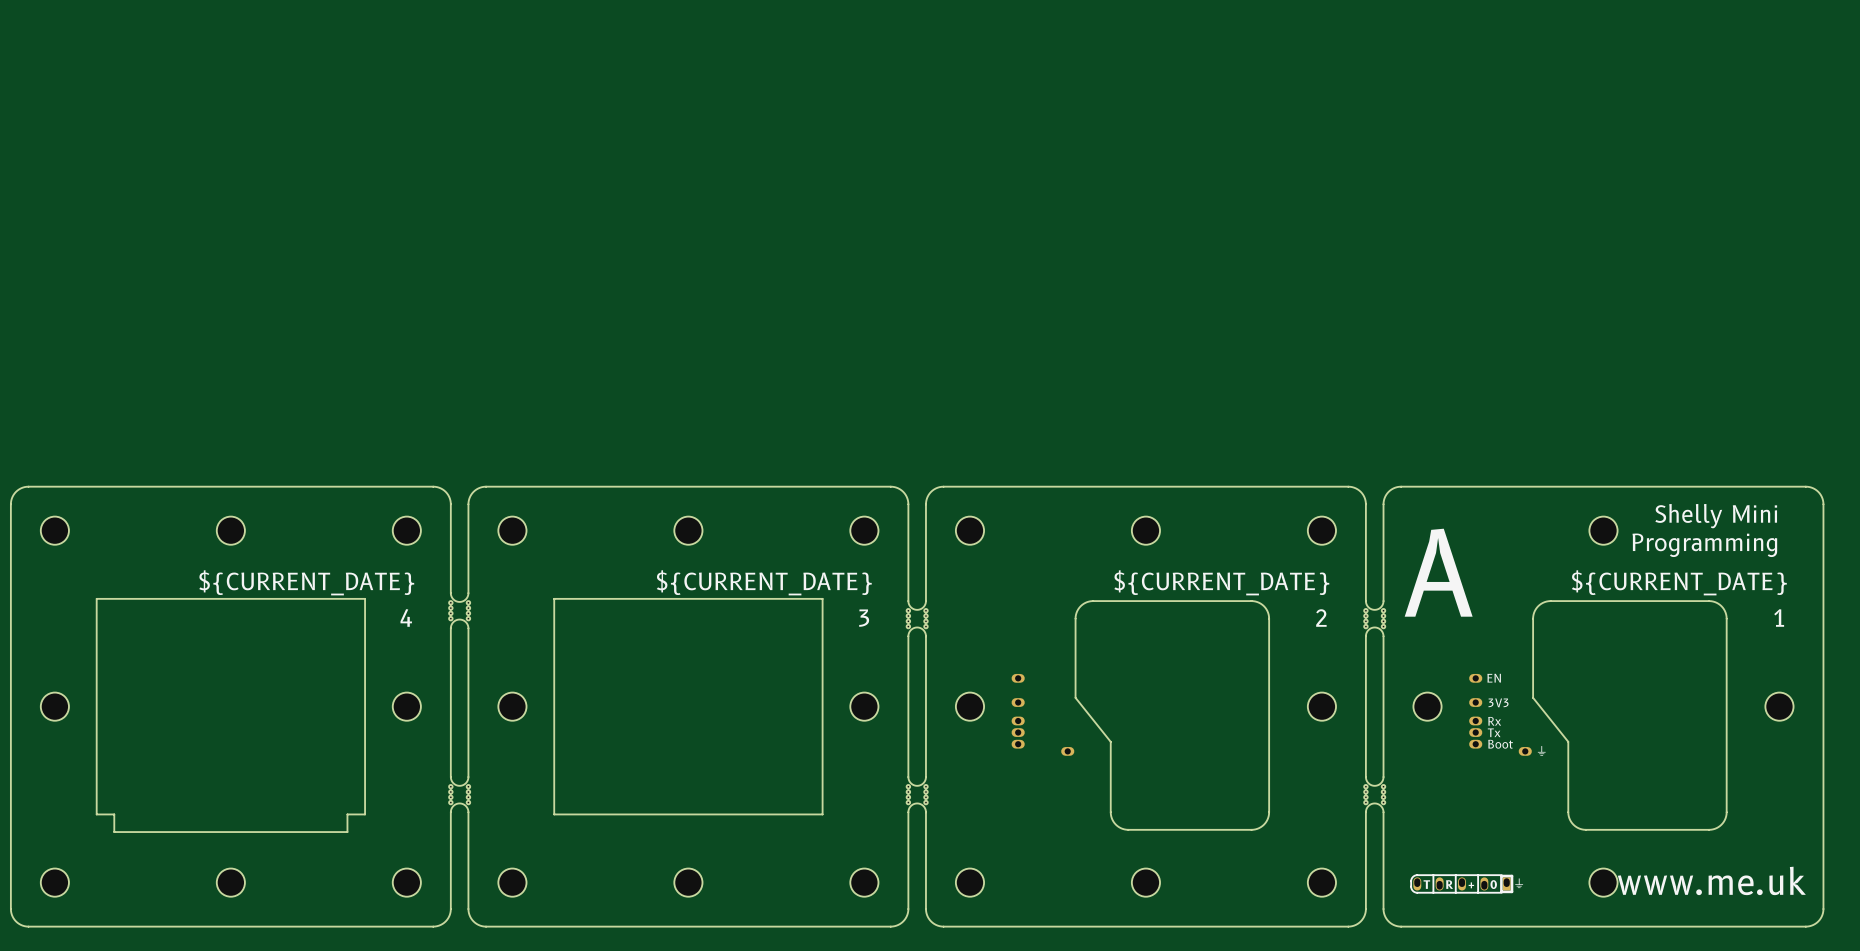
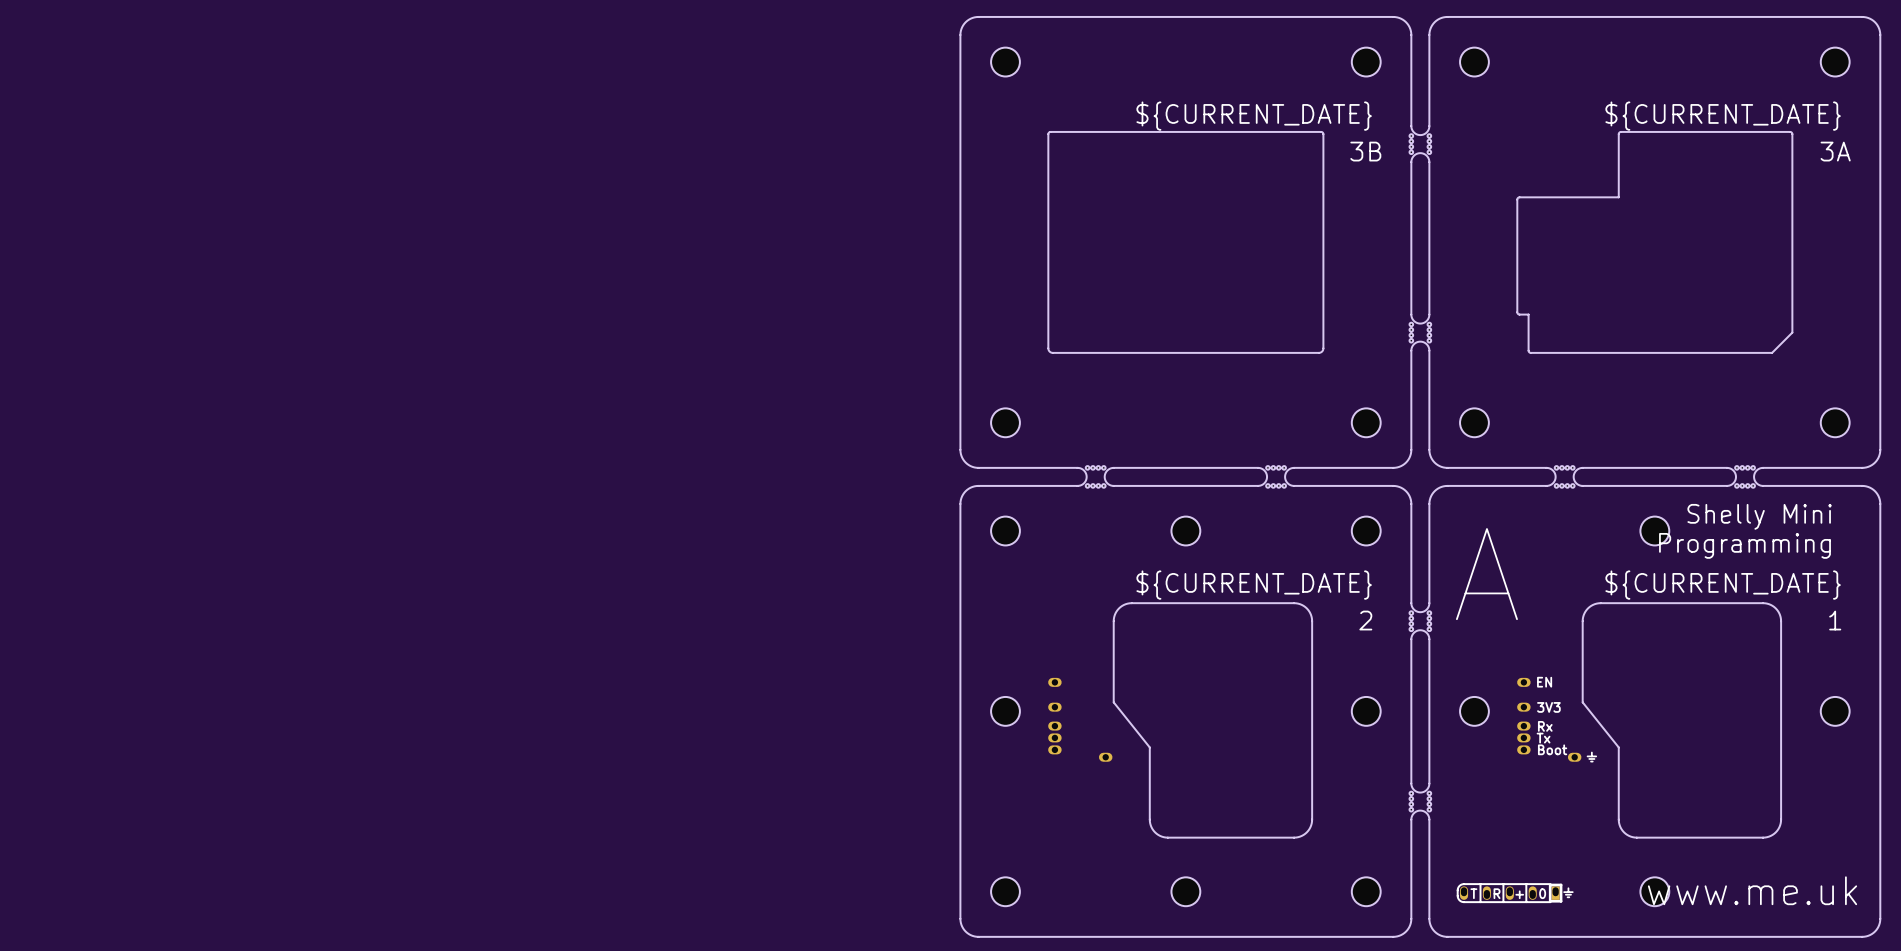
part: none -> (1005, 62)
part: none -> (1366, 62)
part: none -> (1474, 62)
part: none -> (1835, 62)
text: none -> ${CURRENT_DATE} (1254, 116)
text: none -> ${CURRENT_DATE} (1723, 116)
board edge: none -> (1411, 126) (1411, 32) (1407, 23) (1397, 17) (978, 16) (965, 22) (960, 34) (960, 453) (967, 463) (976, 467) (1077, 467)
board edge: none -> (1429, 126) (1429, 32) (1433, 23) (1443, 17) (1862, 16) (1875, 22) (1880, 34) (1879, 453) (1873, 463) (1864, 467) (1763, 467)
board edge: none -> (1050, 131) (1322, 132) (1322, 351) (1318, 352) (1050, 351) (1048, 348) (1048, 134) (1050, 131)
board edge: none -> (1621, 131) (1792, 133) (1792, 332) (1772, 352) (1528, 351) (1528, 314) (1519, 314) (1517, 312) (1517, 198) (1618, 197) (1618, 134) (1621, 131)
part: none -> (1420, 144)
text: none -> 3B (1365, 151)
text: none -> 3A (1835, 151)
board edge: none -> (1411, 162) (1411, 314)
board edge: none -> (1429, 162) (1429, 314)
part: none -> (1420, 332)
board edge: none -> (1411, 350) (1411, 449) (1406, 462) (1393, 467) (1294, 467)
board edge: none -> (1429, 350) (1429, 449) (1434, 462) (1447, 467) (1546, 467)
part: none -> (1366, 422)
part: none -> (1474, 422)
part: none -> (1835, 422)
board edge: none -> (1113, 467) (1258, 467)
board edge: none -> (1582, 467) (1726, 467)
part: none -> (1095, 476)
part: none -> (1276, 476)
part: none -> (1564, 476)
part: none -> (1745, 476)
board edge: (1040, 486) (1075, 486) -> none
board edge: (1216, 486) (1251, 486) -> none
board edge: (1497, 486) (1533, 486) -> none
board edge: (1673, 486) (1709, 486) -> none
part: (54, 530) -> none
part: (230, 530) -> none
part: (406, 530) -> none
part: (512, 530) -> none
part: (688, 530) -> none
part position: (864, 530) -> (1005, 422)
text: ${CURRENT_DATE} (306, 582) -> none
text: ${CURRENT_DATE} (764, 582) -> none
board edge: (450, 593) (450, 502) (445, 491) (437, 487) (28, 486) (17, 490) (12, 496) (10, 504) (11, 912) (17, 922) (28, 926) (437, 926) (447, 920) (450, 910) (450, 812) -> none
board edge: (468, 593) (468, 502) (472, 493) (482, 487) (890, 486) (901, 490) (908, 502) (908, 601) -> none
board edge: (96, 598) (365, 598) (365, 814) (347, 814) (347, 832) (114, 832) (114, 814) (96, 814) (96, 598) -> none
board edge: (554, 598) (822, 598) (822, 814) (554, 814) (554, 598) -> none
board edge: none -> (960, 603) (960, 639)
part: (459, 610) -> none
text: 4 (406, 618) -> none
text: 3 (864, 618) -> none
part: (917, 618) -> none
board edge: (450, 628) (450, 777) -> none
board edge: (468, 628) (468, 777) -> none
board edge: (908, 636) (908, 777) -> none
part: (54, 706) -> none
part: (406, 706) -> none
part: (512, 706) -> none
part: (864, 706) -> none
board edge: none -> (960, 783) (960, 819)
part: (459, 794) -> none
part: (917, 794) -> none
board edge: (468, 812) (468, 910) (475, 922) (486, 926) (894, 926) (904, 920) (908, 910) (908, 812) -> none
part: (54, 882) -> none
part: (230, 882) -> none
part: (406, 882) -> none
part: (512, 882) -> none
part: (688, 882) -> none
part: (864, 882) -> none

